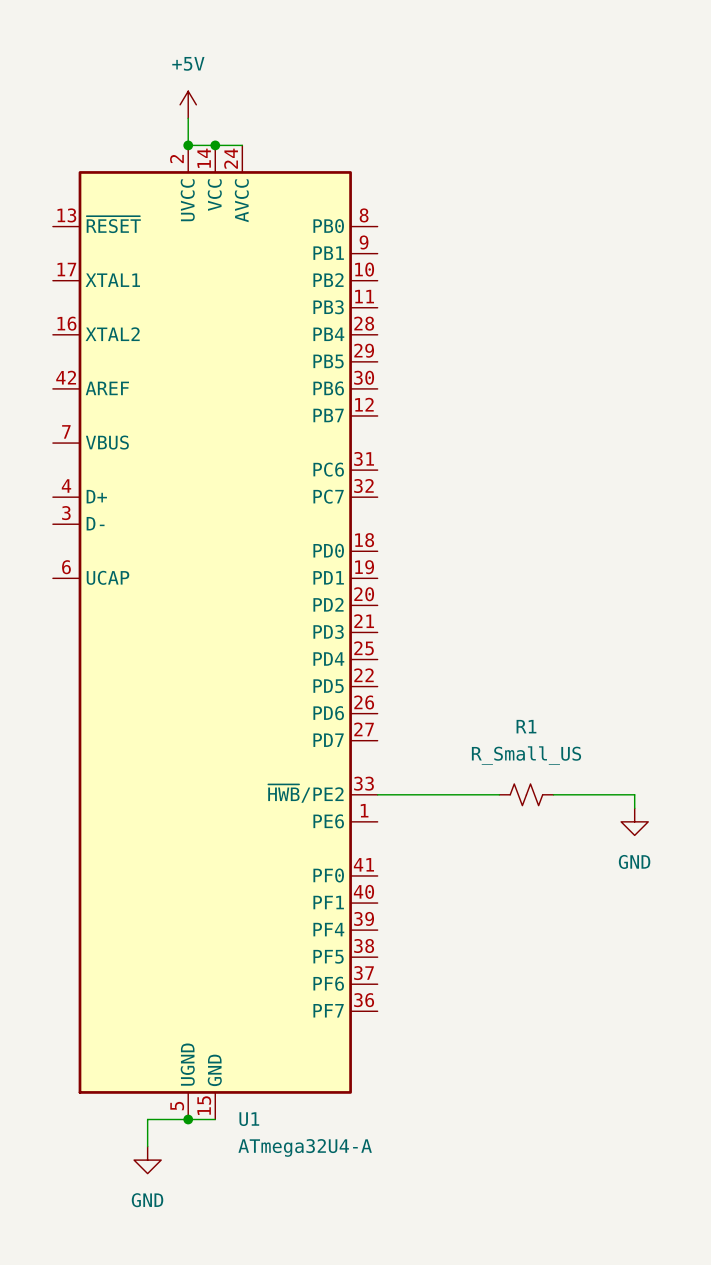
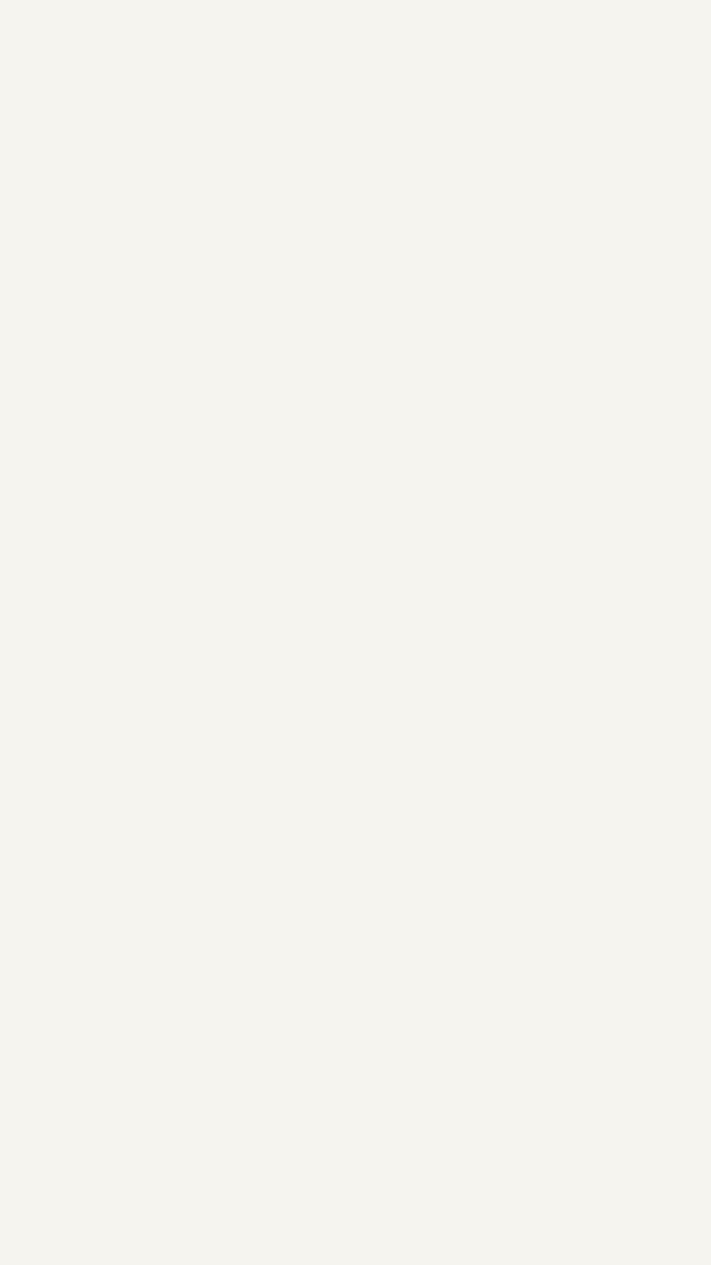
power symbol: +5V (188, 104) -> none
wire: (188, 118) (188, 145) (242, 145) -> none
junction: (188, 145) -> none
junction: (215, 145) -> none
U1: ATmega32U4-A (215, 632) -> none
wire: (377, 794) (499, 794) -> none
R1: R_Small_US (526, 794) -> none
wire: (553, 794) (634, 794) (634, 808) -> none
power symbol: GND (634, 821) -> none
junction: (188, 1119) -> none
wire: (215, 1119) (147, 1119) (147, 1146) -> none
power symbol: GND (147, 1160) -> none

